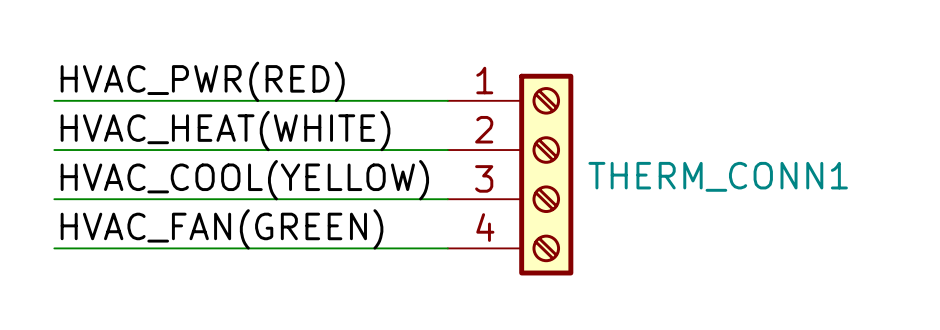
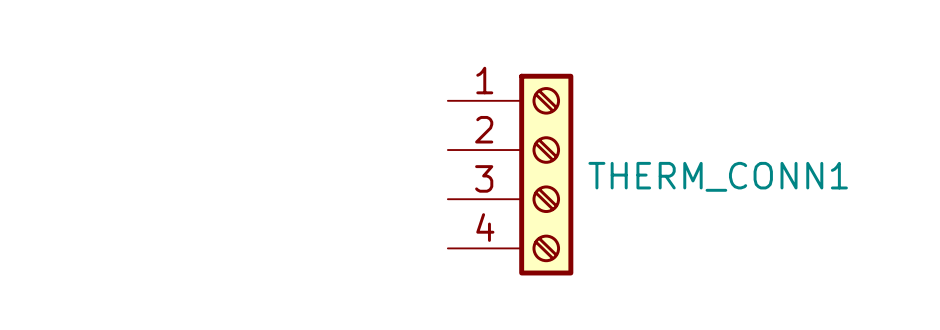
label: HVAC_PWR(RED) (202, 81) -> none
wire: (54, 100) (447, 100) -> none
label: HVAC_HEAT(WHITE) (225, 131) -> none
wire: (54, 150) (447, 150) -> none
label: HVAC_COOL(YELLOW) (244, 180) -> none
wire: (54, 199) (447, 199) -> none
label: HVAC_FAN(GREEN) (222, 229) -> none
wire: (54, 248) (447, 248) -> none

